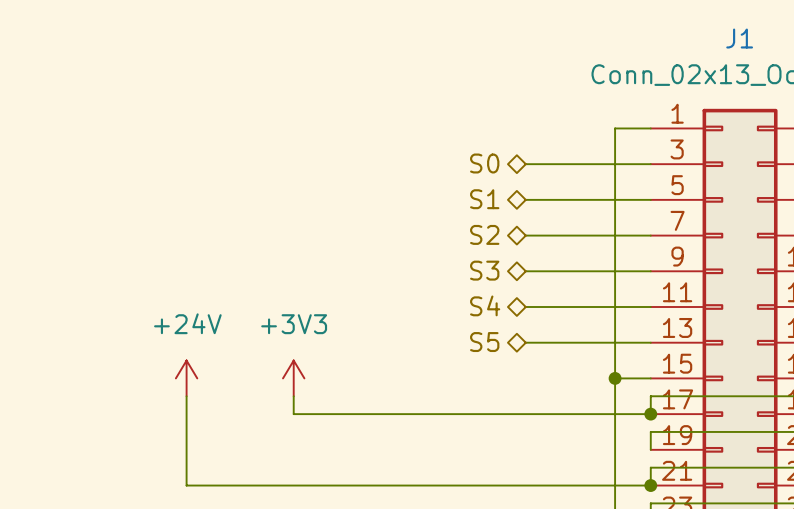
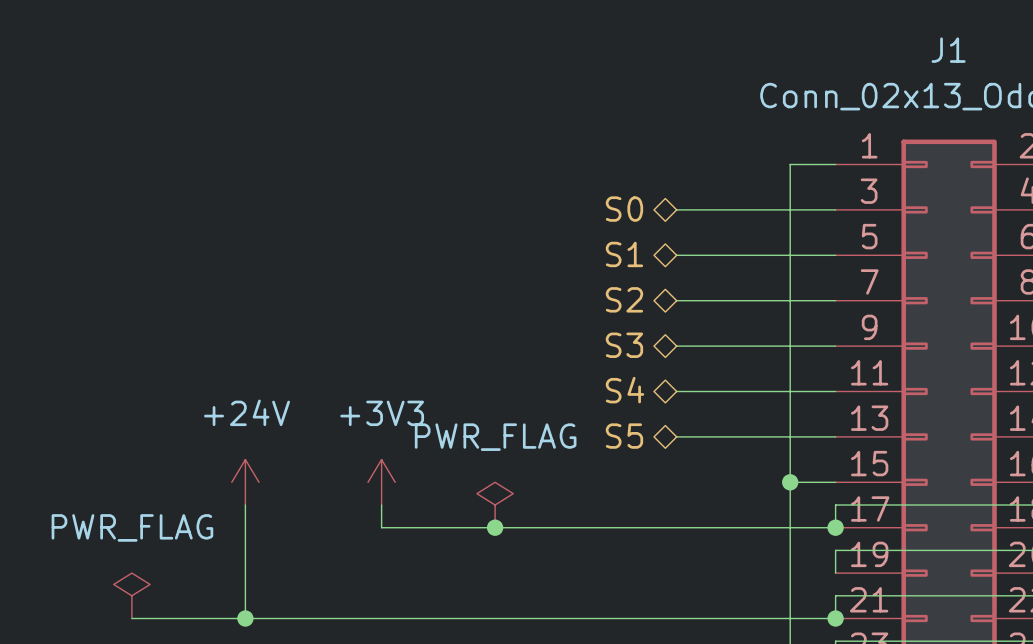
power symbol: none -> PWR_FLAG (495, 505)
junction: none -> (495, 527)
power symbol: none -> PWR_FLAG (131, 595)
wire: none -> (131, 618) (245, 618)
junction: none -> (245, 618)

